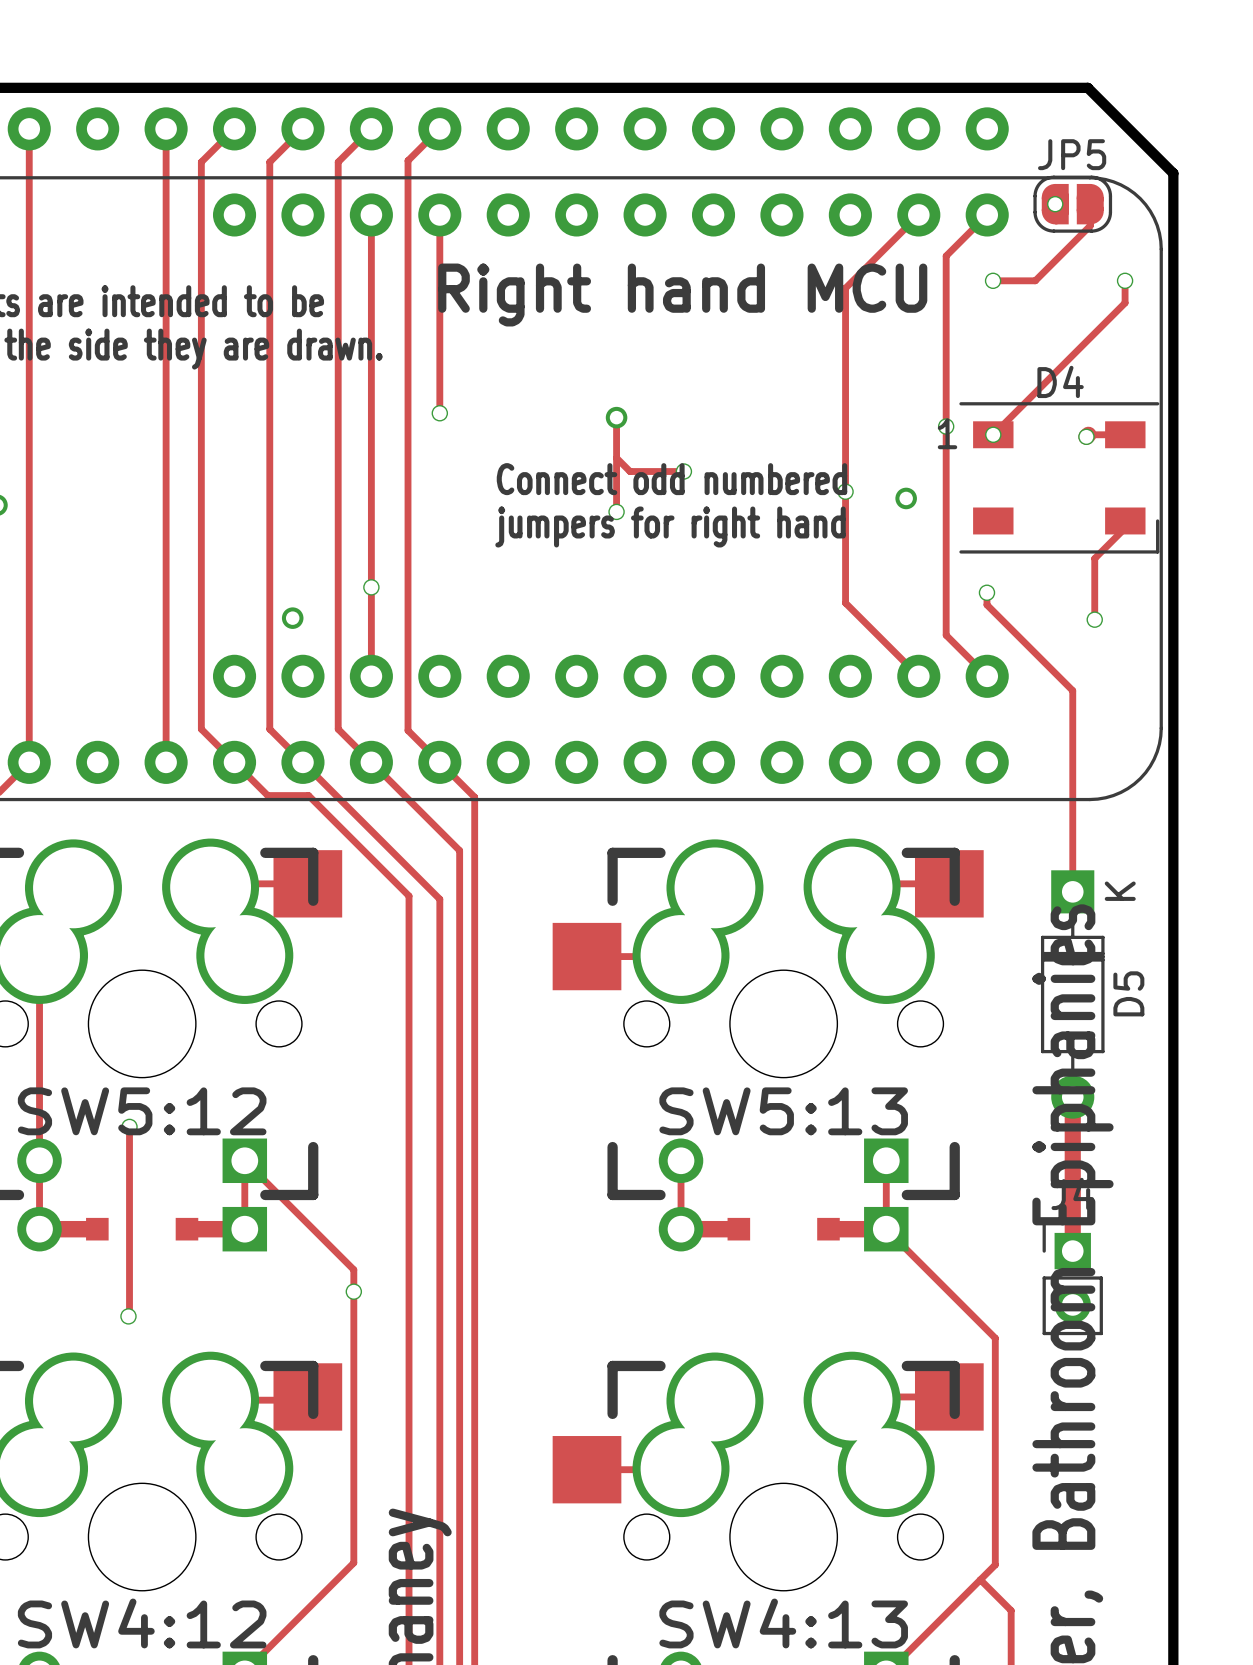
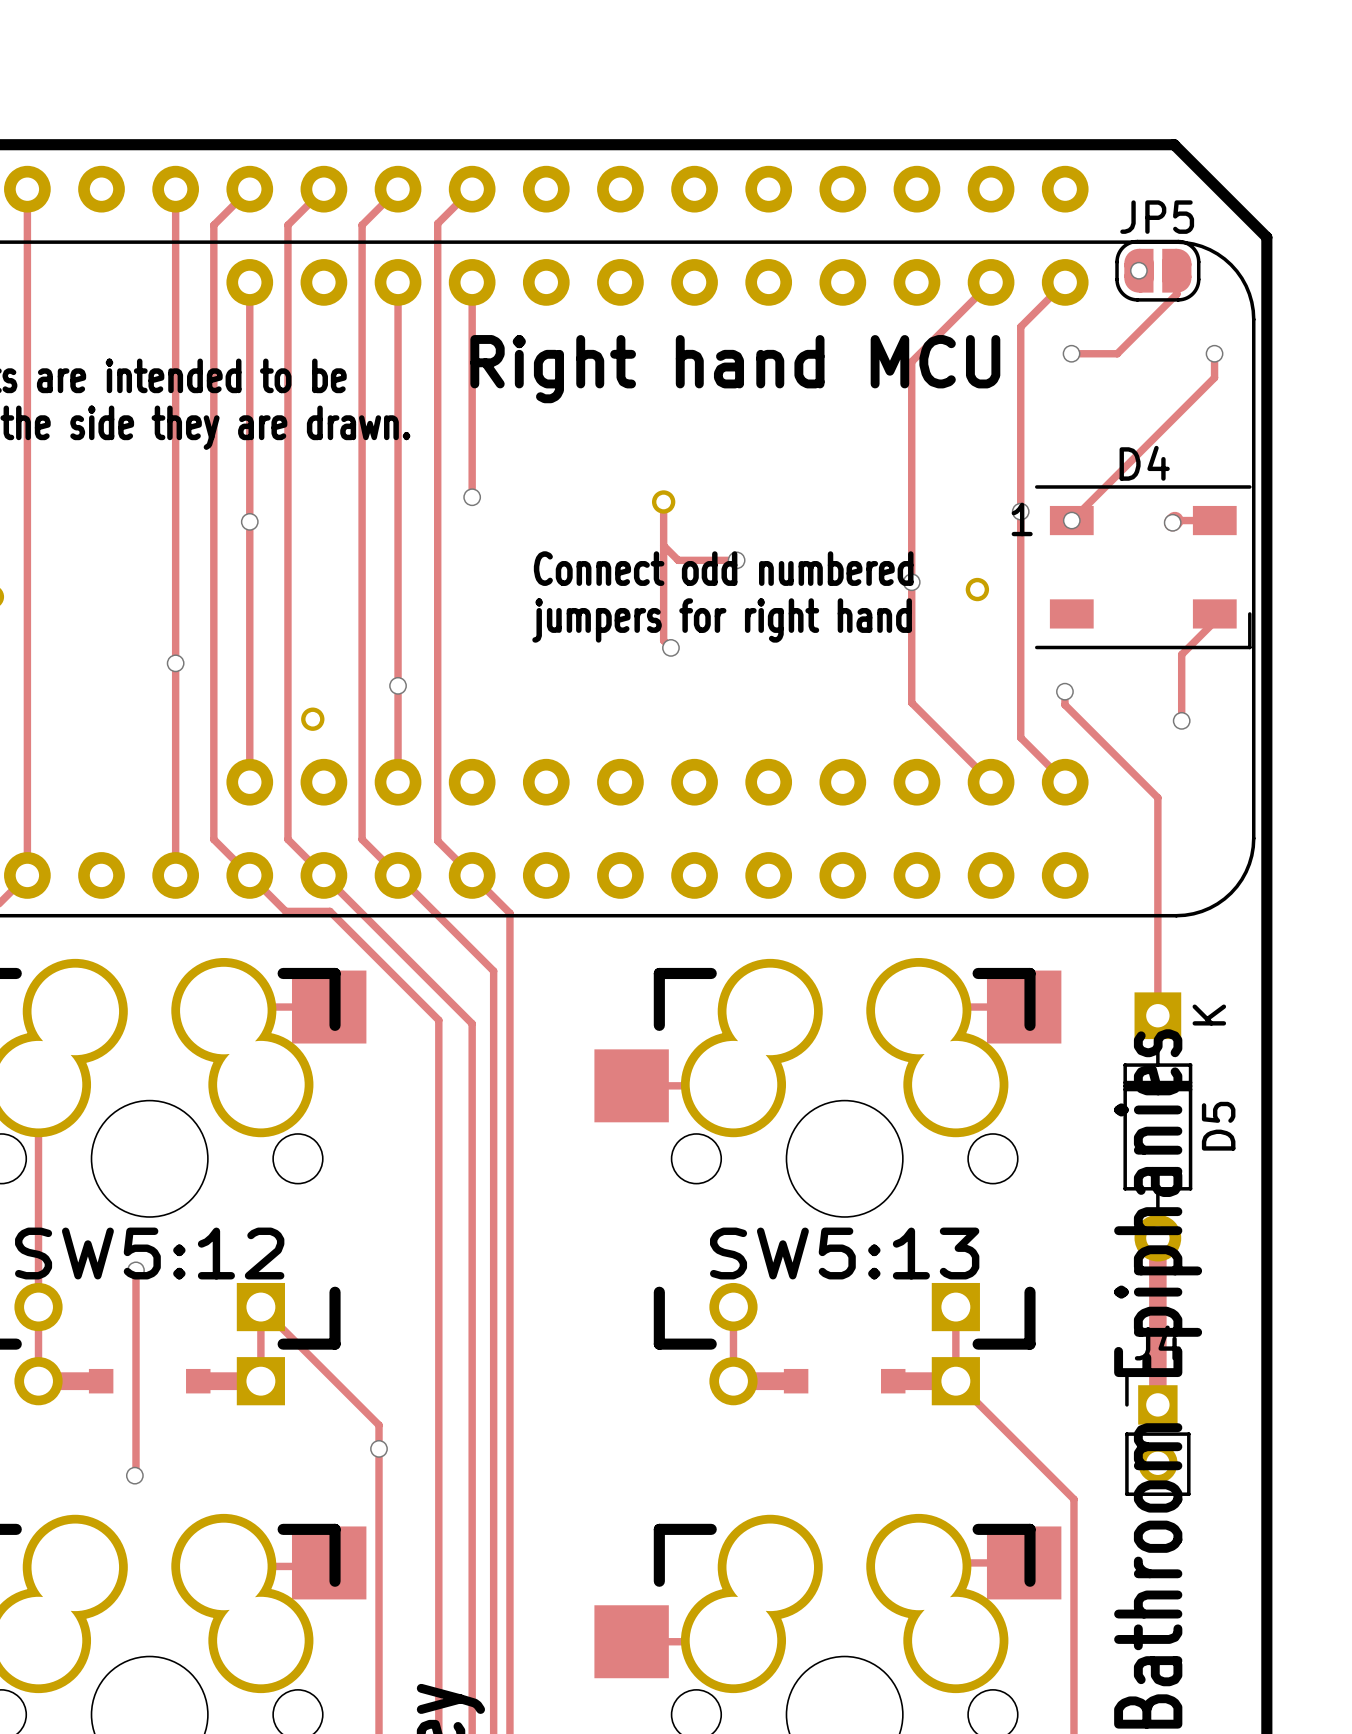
track: none -> (249, 282) (249, 782)
via: none -> (249, 521)
track: none -> (663, 604) (663, 640) (670, 647)
via position: (616, 511) -> (670, 647)
via: none -> (175, 663)

